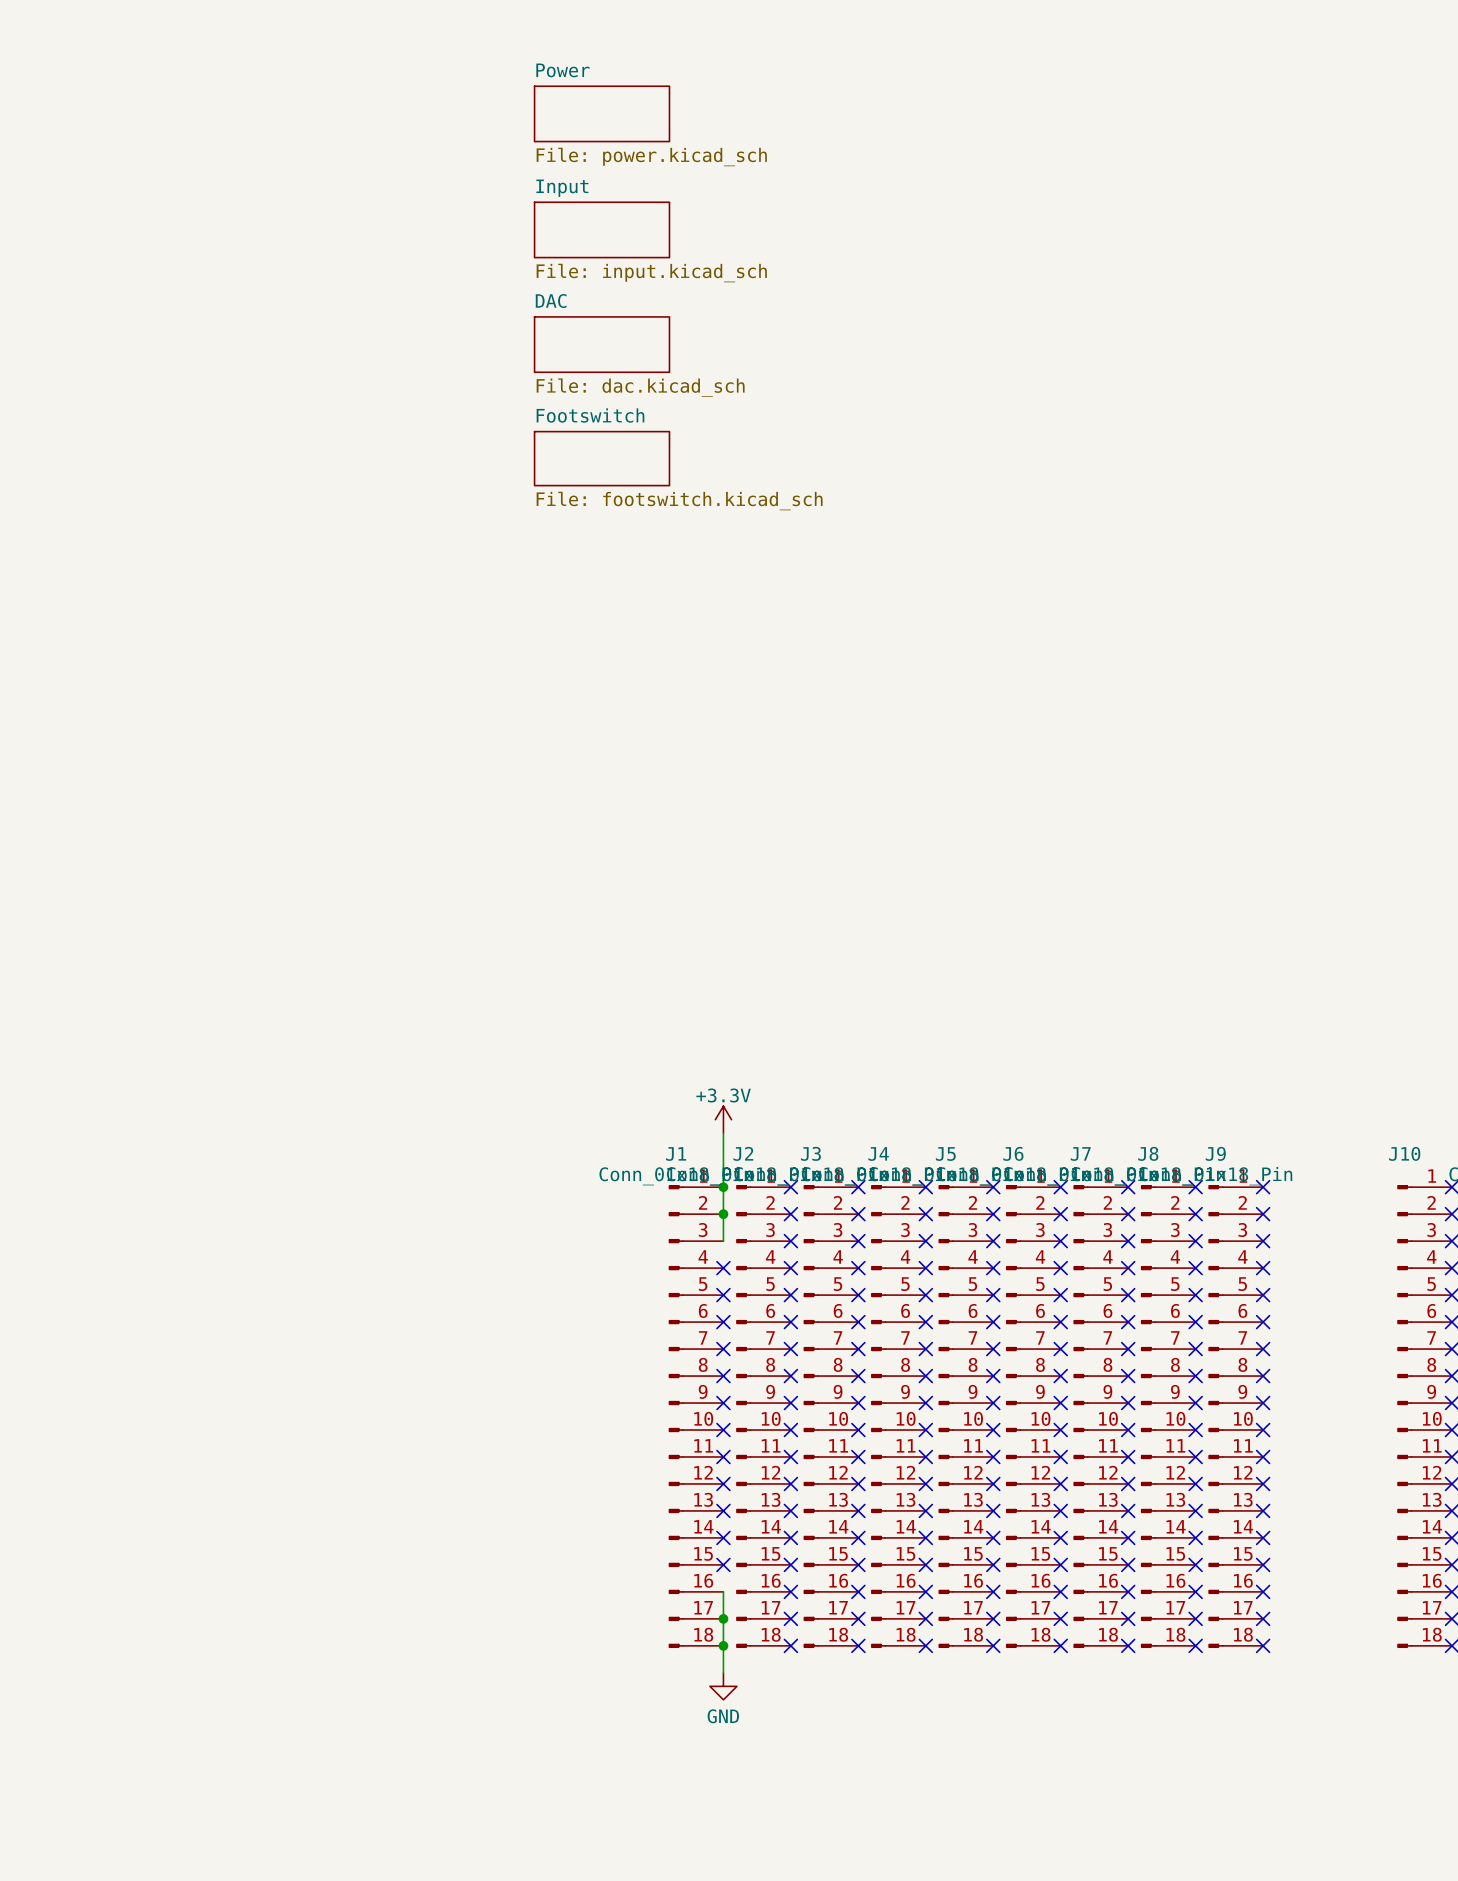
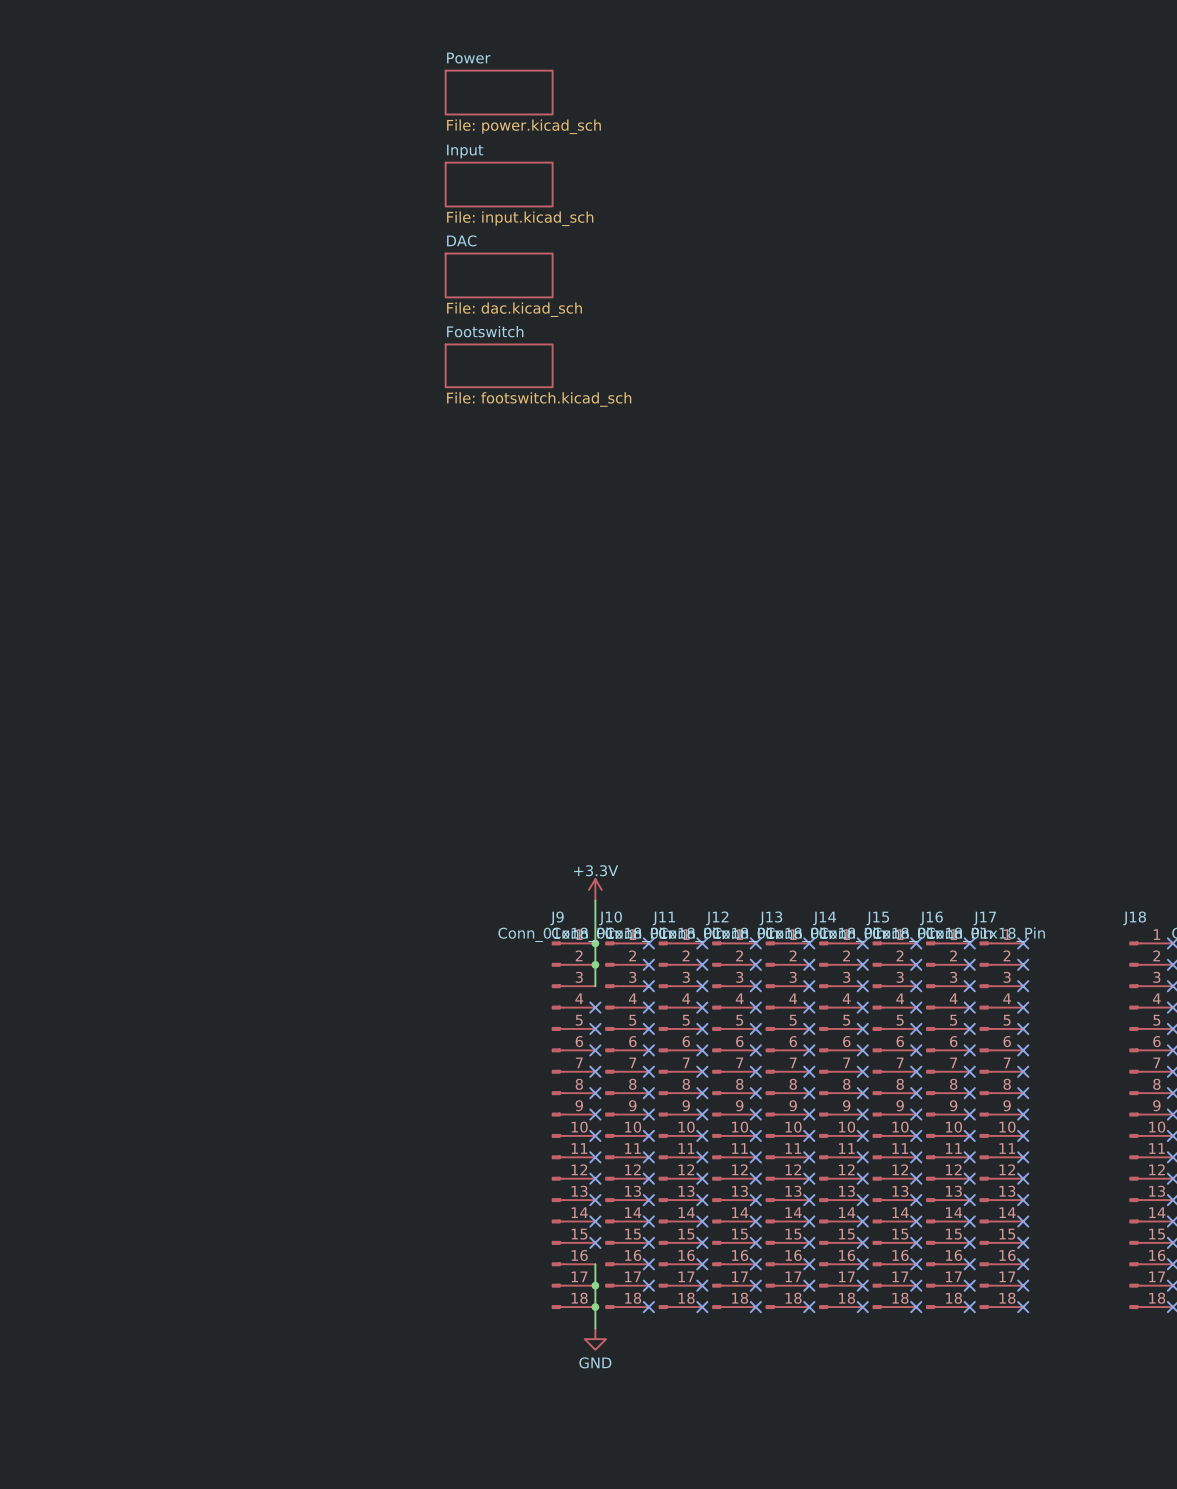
J2 name: J2 (743, 1153) -> J10 (610, 918)
J3 name: J3 (810, 1153) -> J11 (663, 918)
J6 name: J6 (1013, 1153) -> J14 (824, 918)
J8 name: J8 (1148, 1153) -> J16 (931, 918)
J9 name: J9 (1215, 1153) -> J17 (984, 918)
J10 name: J10 (1404, 1153) -> J18 (1134, 918)
J1 name: J1 (676, 1154) -> J9 (557, 918)
J4 name: J4 (878, 1154) -> J12 (717, 918)
J5 name: J5 (945, 1154) -> J13 (770, 918)
J7 name: J7 (1080, 1154) -> J15 (877, 918)

